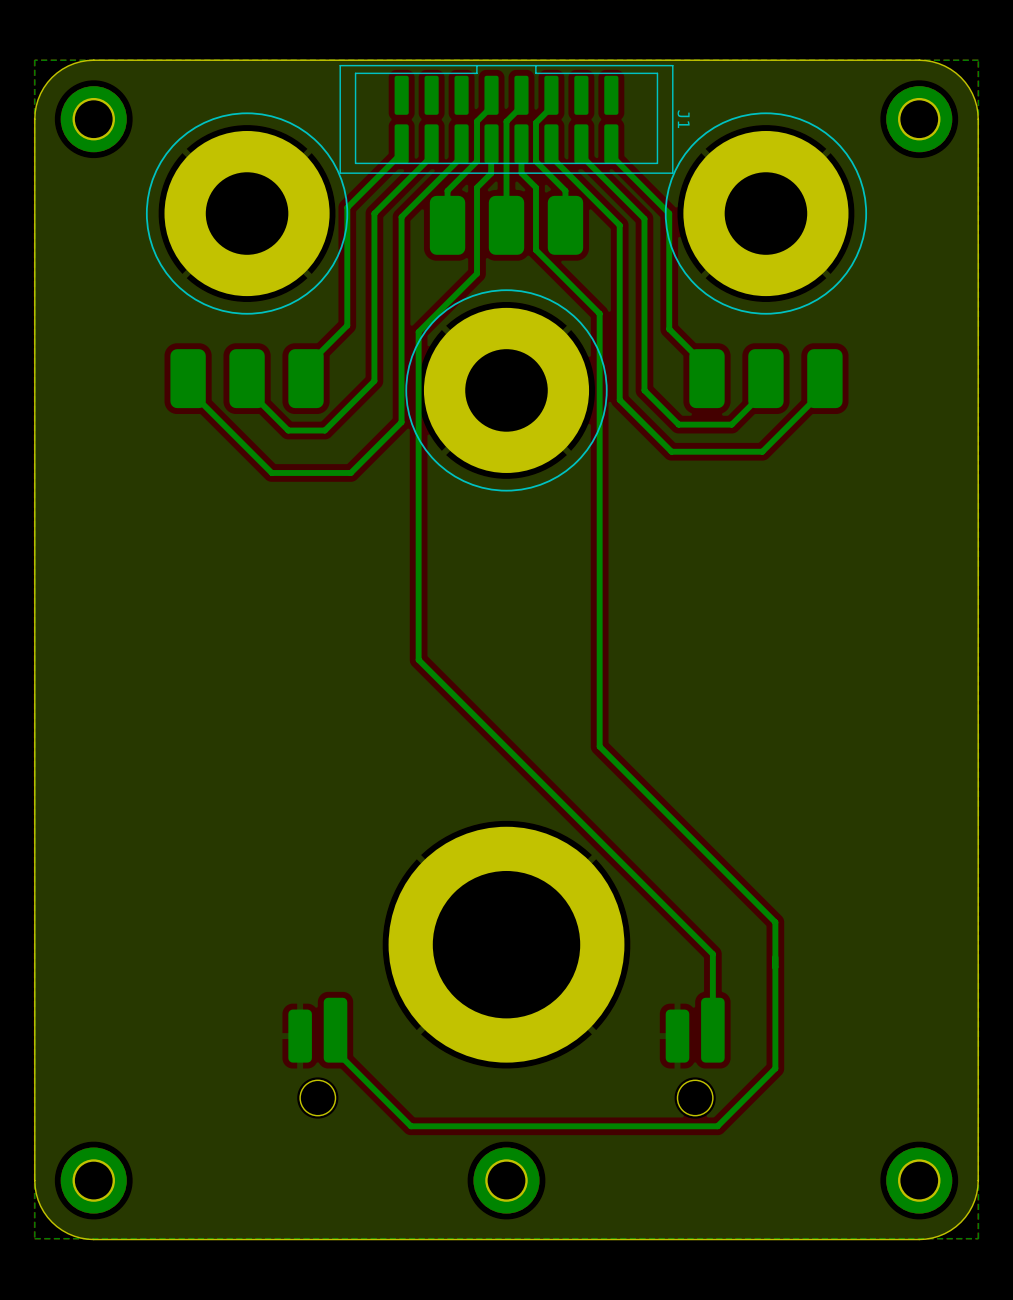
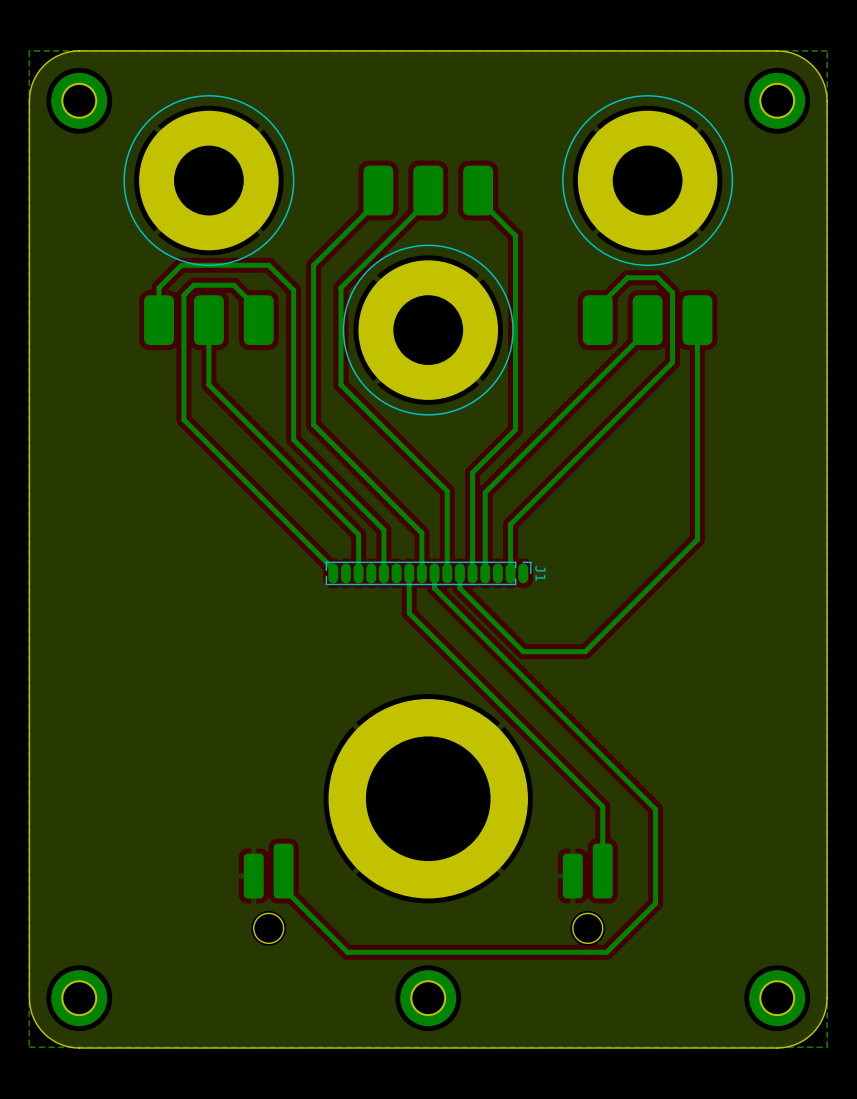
J1 footprint: [339, 64, 674, 174] -> [325, 561, 532, 586]
bottom track: (491, 95) (491, 106) (477, 121) (477, 161) (447, 190) (447, 225) -> (421, 573) (421, 533) (313, 424) (313, 265) (378, 200) (378, 190)
bottom track: (521, 95) (521, 106) (506, 121) (506, 225) -> (447, 573) (447, 491) (341, 384) (341, 287) (428, 200) (428, 190)
bottom track: (551, 95) (551, 107) (535, 122) (535, 161) (565, 190) (565, 225) -> (472, 573) (472, 472) (515, 429) (515, 235) (478, 198) (478, 190)
J1 name position: J1 (683, 119) -> J1 (540, 573)
bottom track: (401, 143) (401, 153) (347, 207) (347, 325) (306, 366) -> (333, 573) (333, 569) (183, 419) (183, 295) (193, 285) (233, 285) (258, 310)
bottom track: (431, 143) (431, 156) (374, 213) (374, 380) (324, 430) (288, 430) (247, 389) -> (358, 573) (358, 534) (208, 384) (208, 329)
bottom track: (461, 143) (461, 157) (401, 217) (401, 422) (350, 472) (271, 472) (192, 393) -> none
bottom track: (491, 143) (491, 173) (477, 187) (477, 273) (418, 332) (418, 659) (484, 725) -> (409, 573) (409, 613)
bottom track: (521, 143) (521, 173) (535, 187) (535, 250) (599, 313) (599, 746) (775, 922) (775, 957) -> (434, 573) (434, 588) (655, 809)
bottom track: (551, 143) (551, 157) (619, 225) (619, 399) (671, 451) (762, 451) (824, 389) -> (459, 573) (459, 588) (523, 651) (585, 651) (697, 539) (697, 329)
bottom track: (581, 143) (581, 155) (644, 218) (644, 390) (678, 424) (731, 424) -> (485, 576) (485, 492) (618, 359)
bottom track: (611, 143) (611, 155) (669, 213) (669, 329) (706, 366) -> (510, 573) (510, 524) (672, 362) (672, 292) (657, 277) (627, 277) (597, 307) (597, 310)
bottom track: none -> (159, 320) (159, 287) (181, 265) (268, 265) (293, 290) (293, 439) (383, 530) (383, 573)

